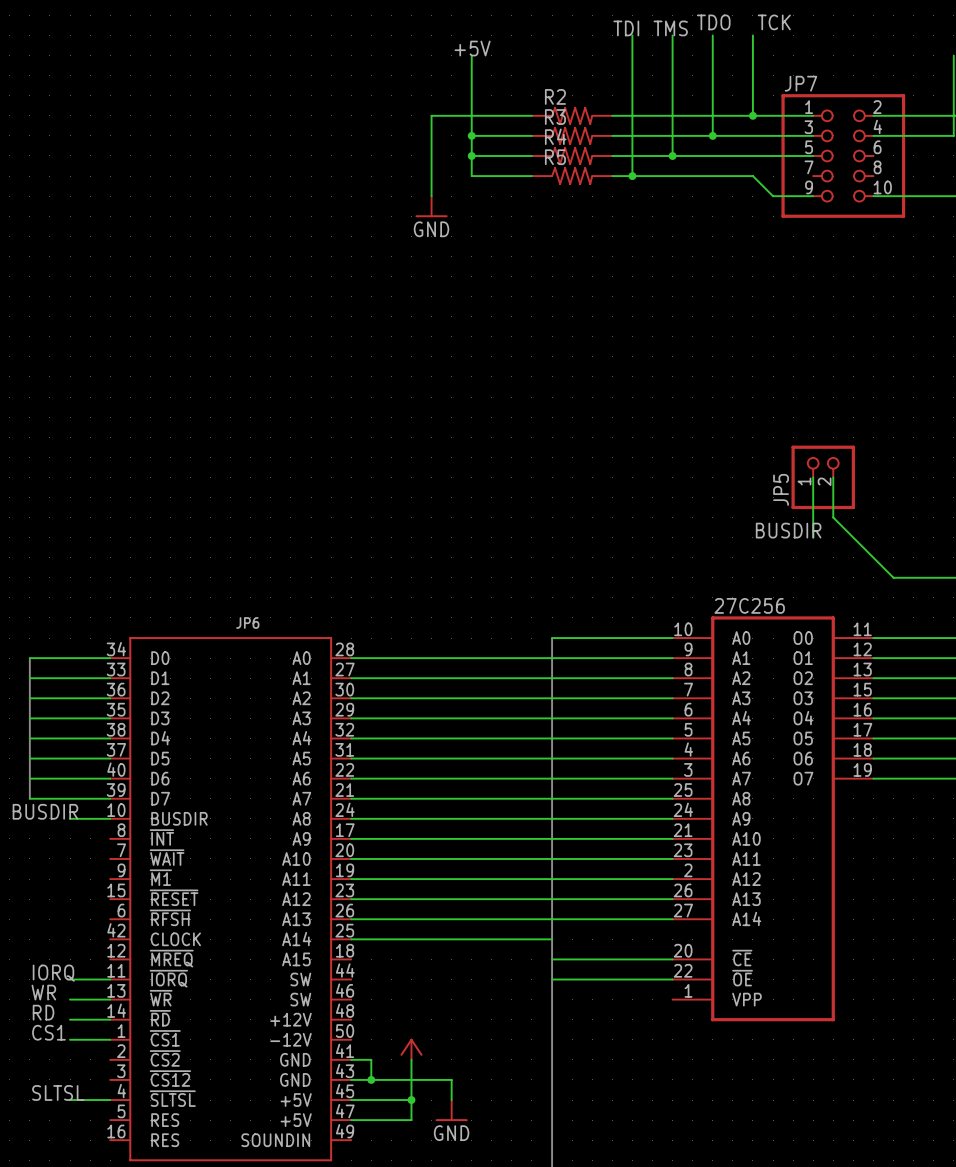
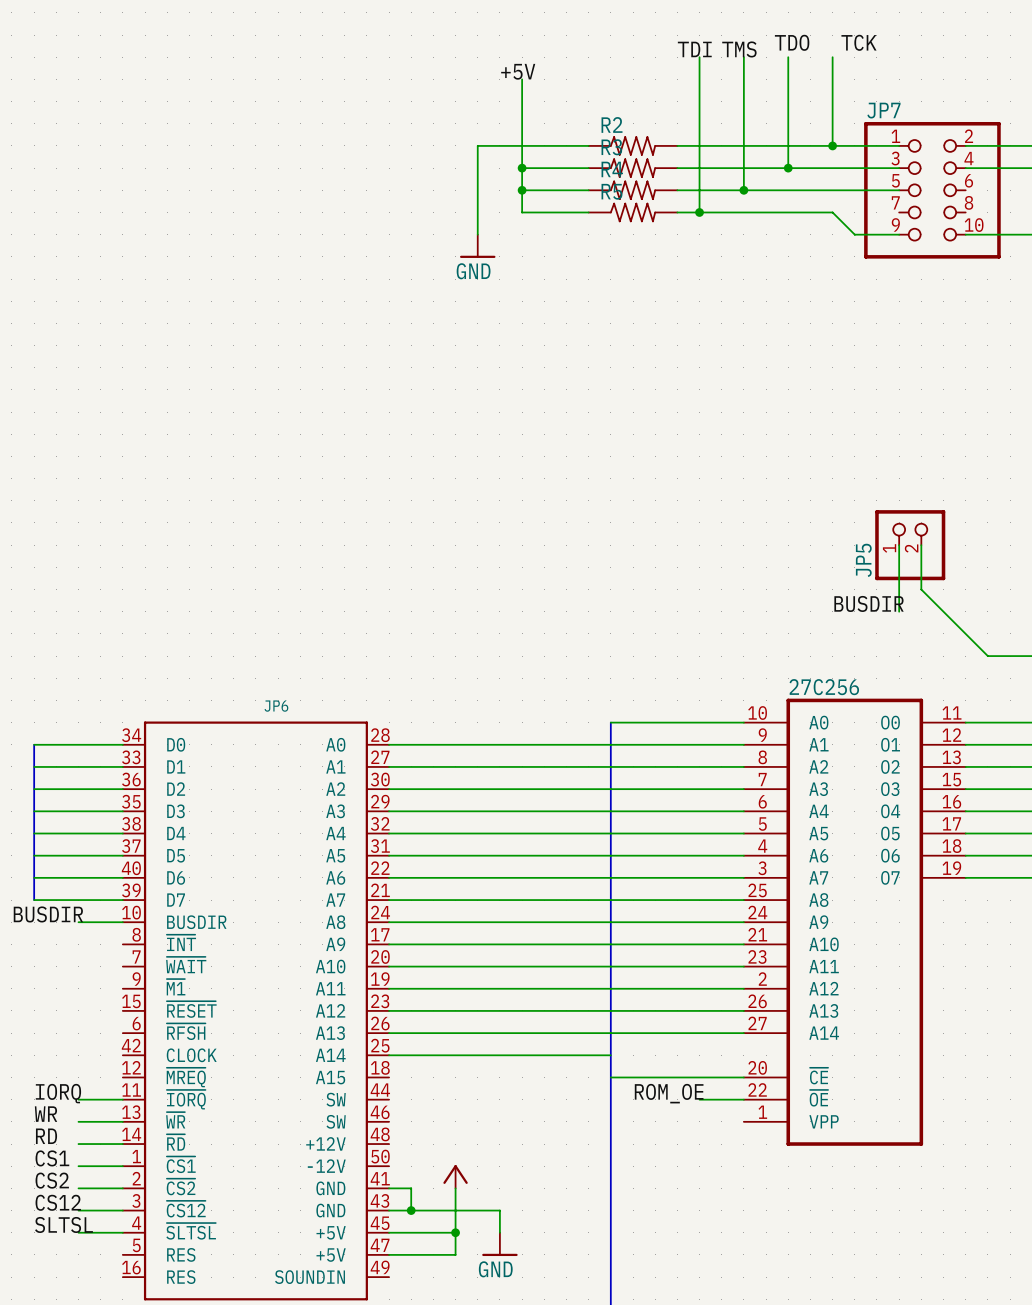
label: none -> ROM_OE (669, 1093)
wire: (552, 979) (632, 979) -> none
label: none -> CS2 (52, 1180)
wire: none -> (78, 1188) (122, 1188)
label: none -> CS12 (58, 1202)
wire: none -> (78, 1210) (122, 1210)

